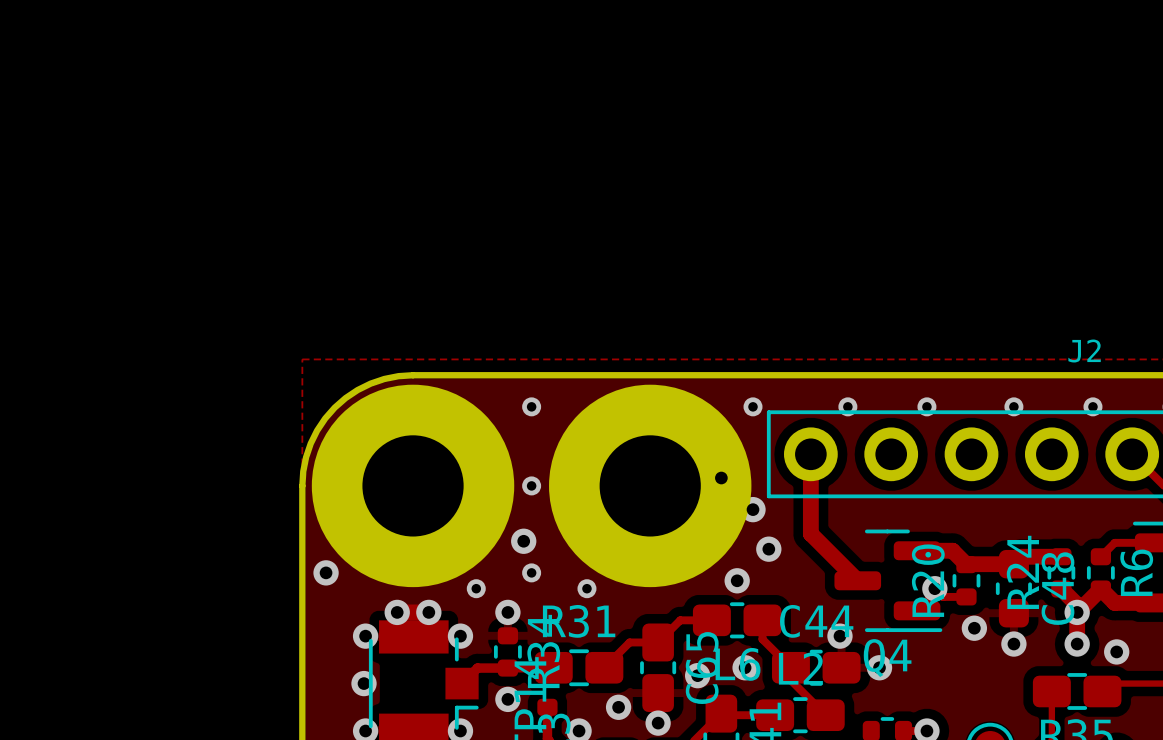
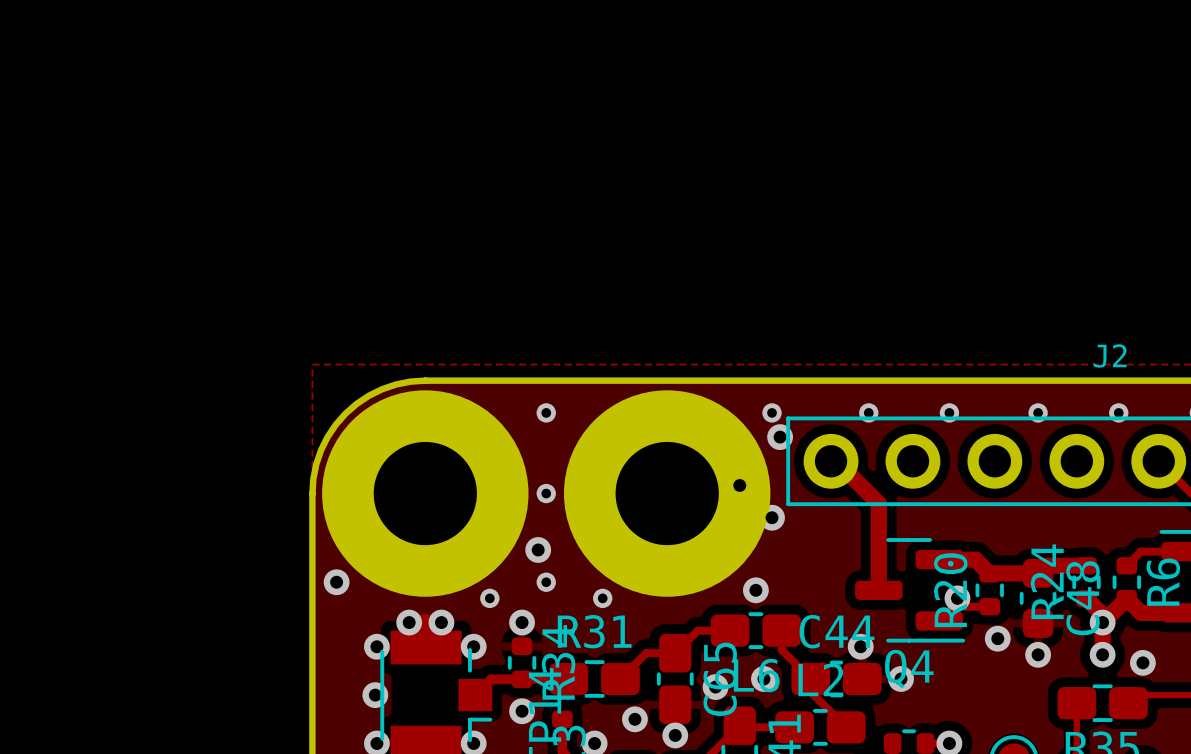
track: (810, 454) (810, 533) (857, 580) -> (831, 461) (836, 461) (878, 503) (878, 590)
via position: (768, 549) -> (780, 437)

